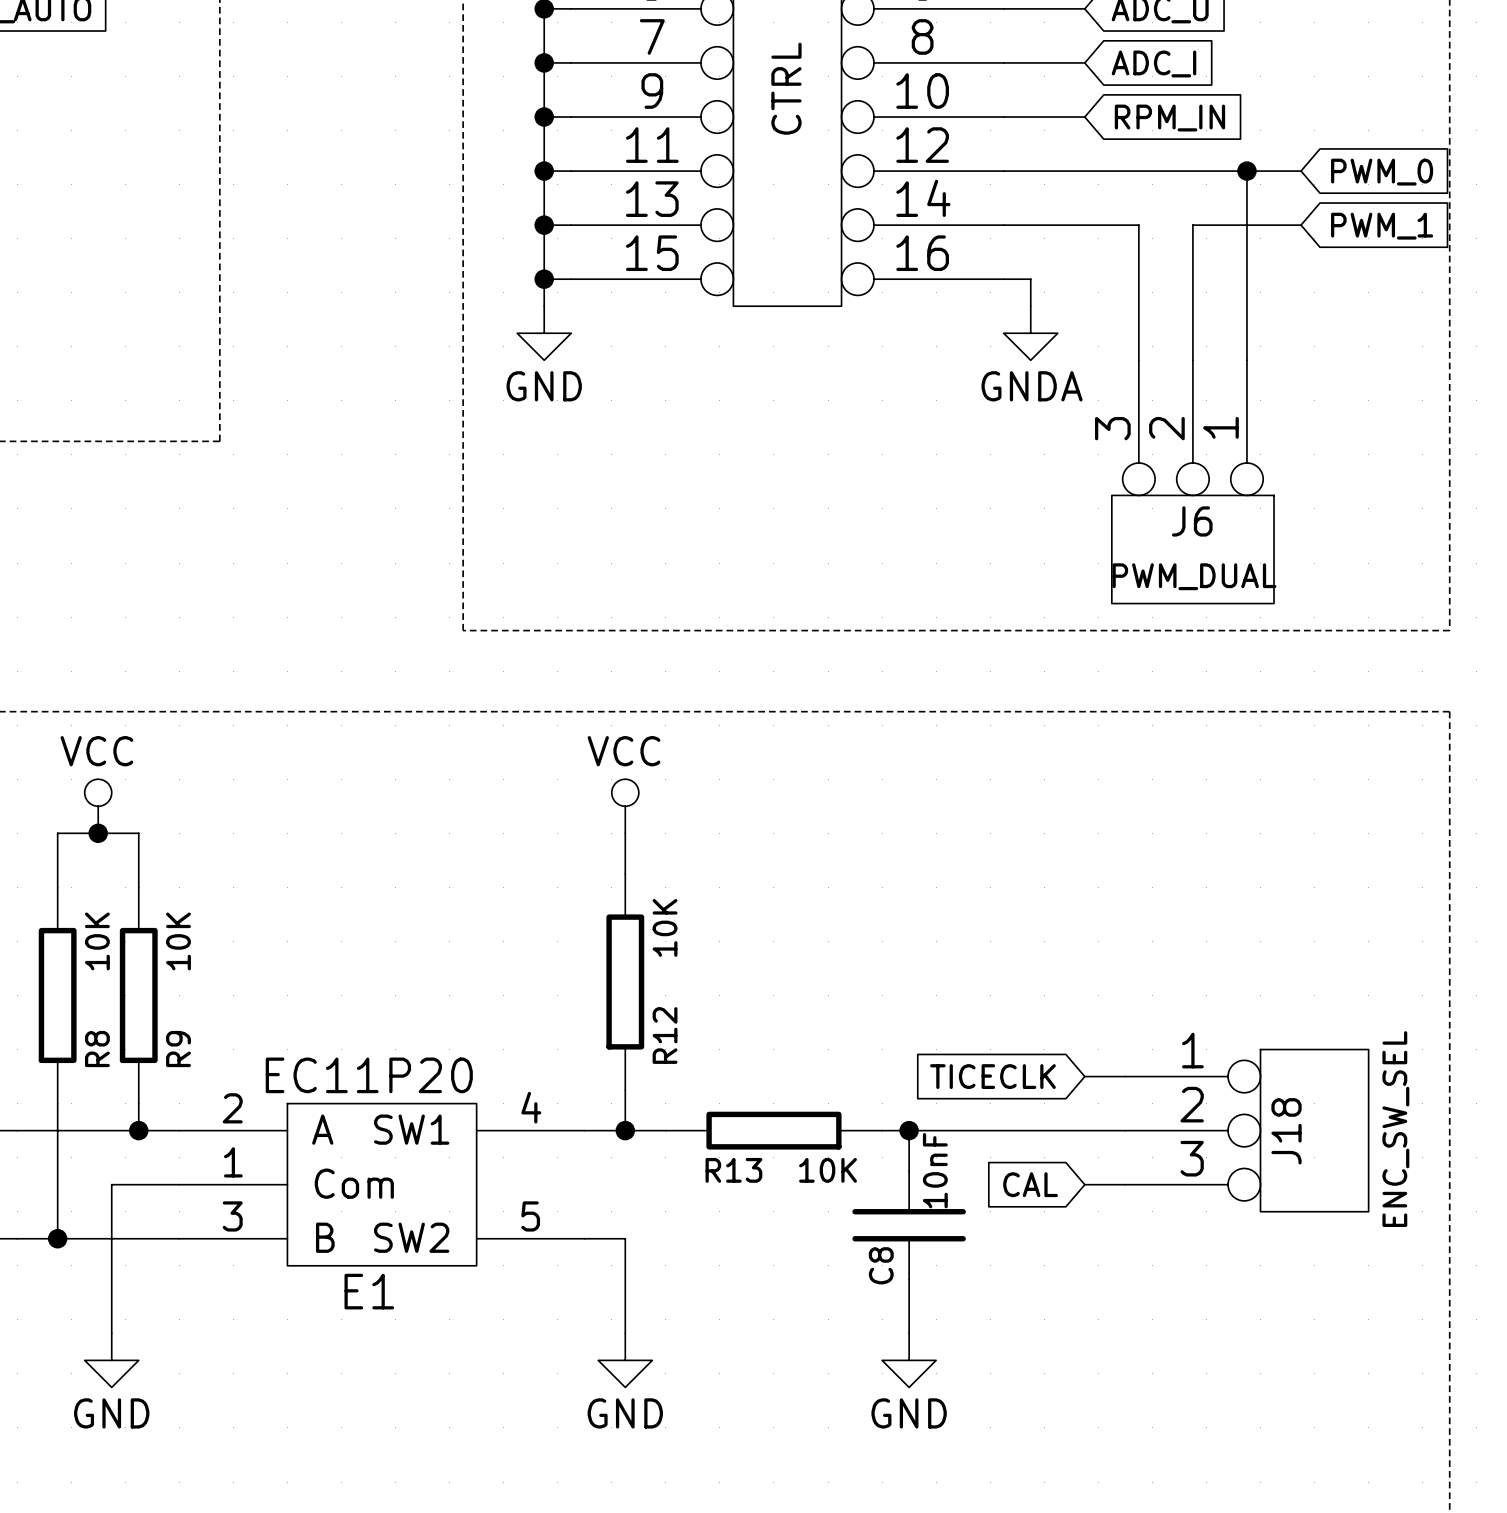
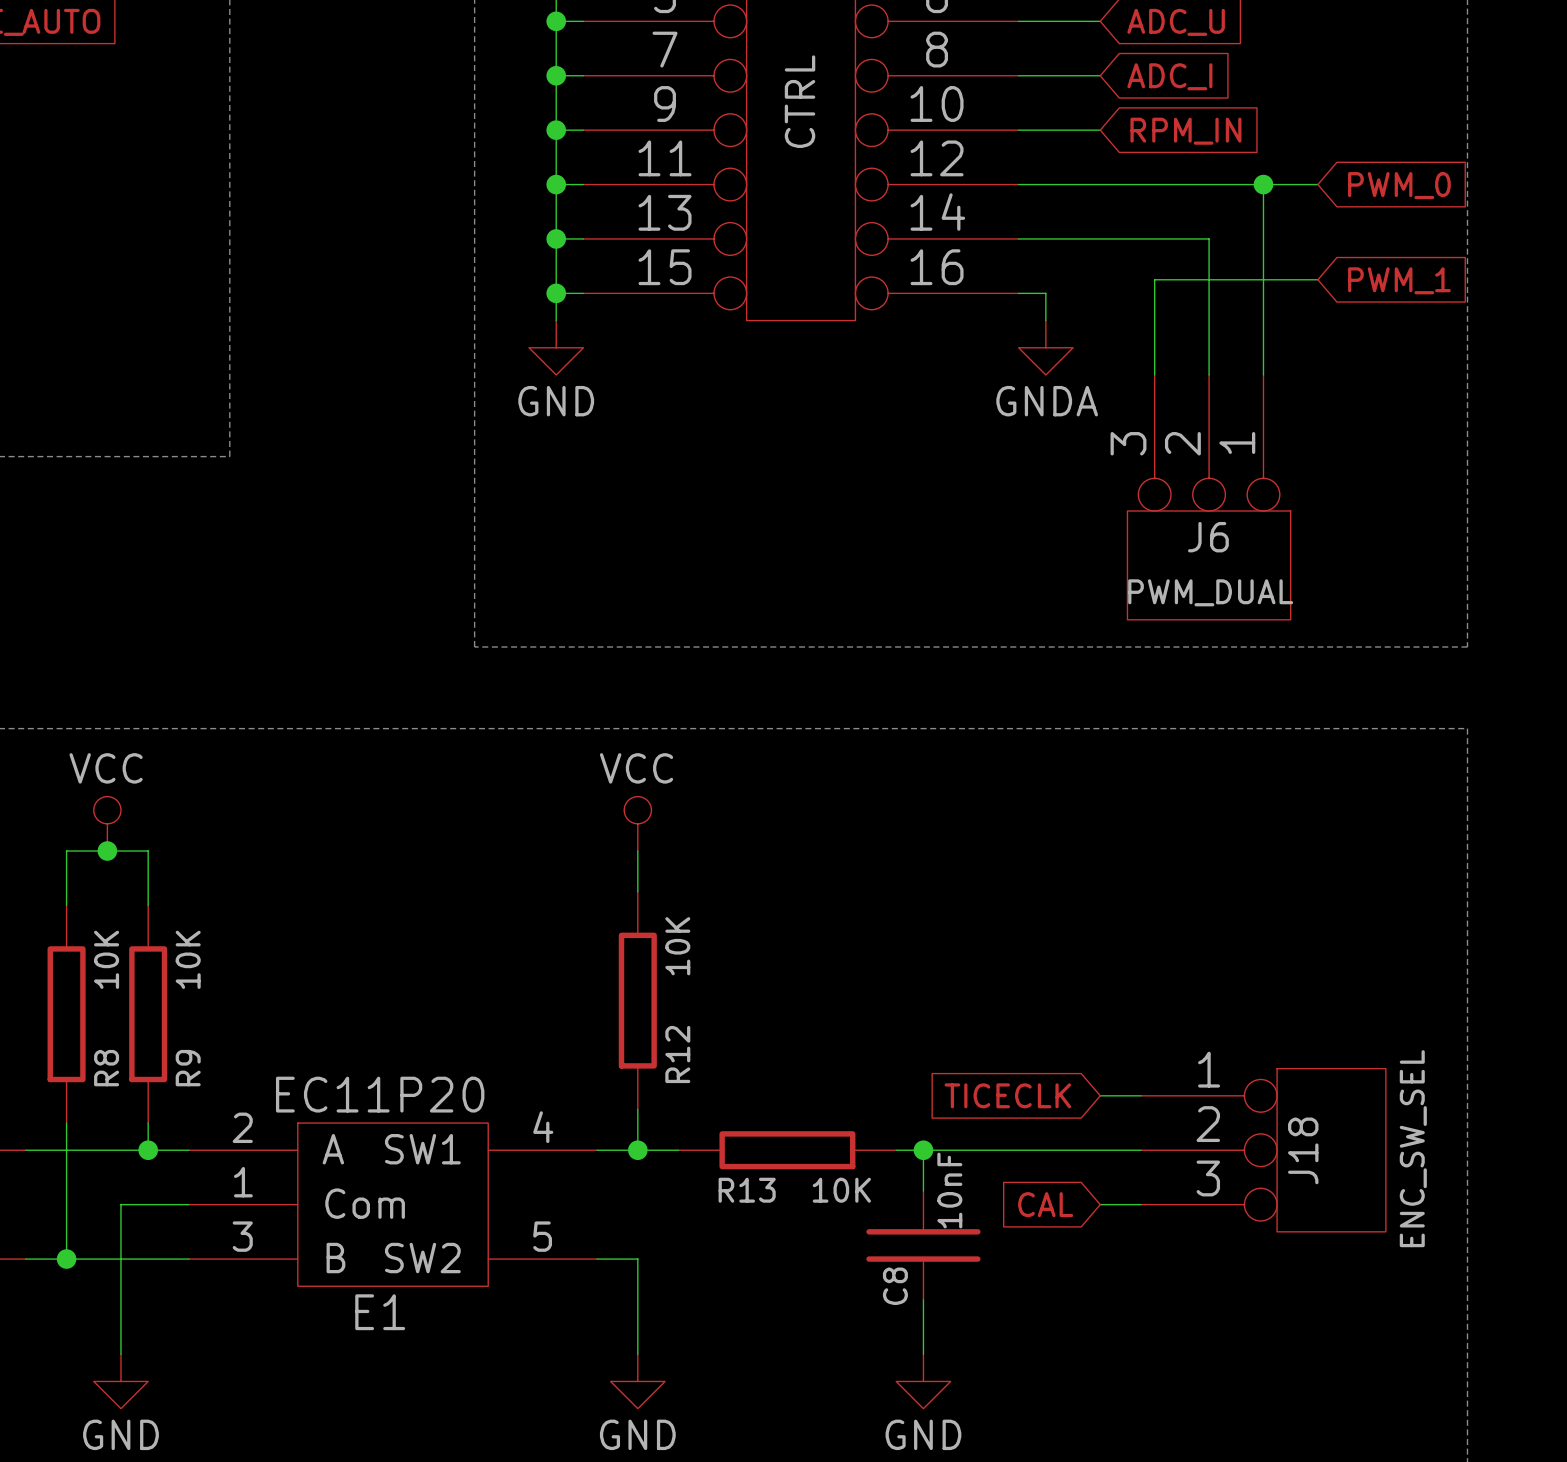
wire: (1138, 225) (1138, 265) -> (1154, 238) (1209, 238)
wire: (1192, 225) (1301, 225) -> none
global label position: PWM_1 (1382, 226) -> PWM_1 (1399, 280)
wire: none -> (1154, 279) (1317, 279)

